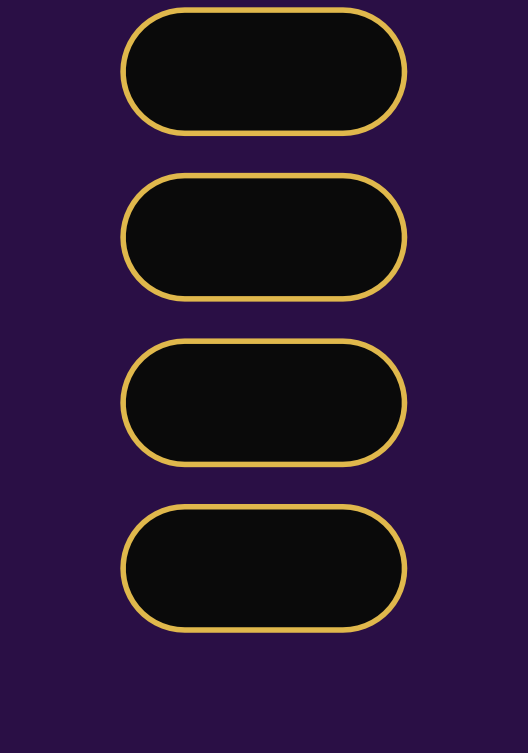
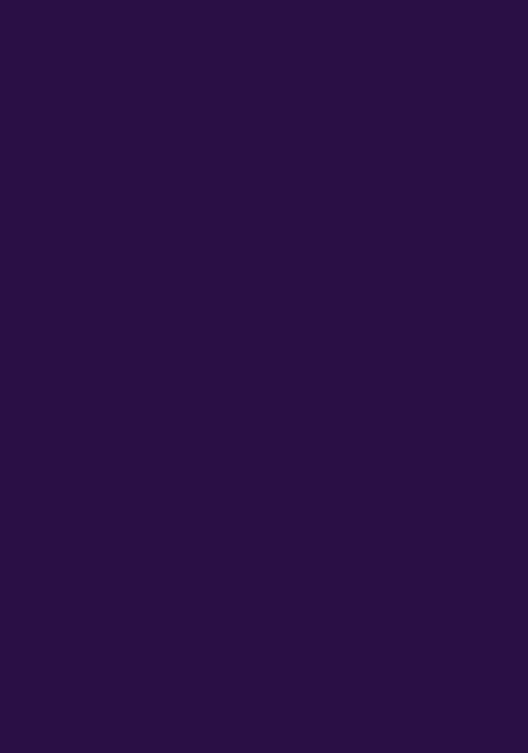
part: (263, 71) -> none
part: (263, 237) -> none
part: (263, 402) -> none
part: (263, 568) -> none

